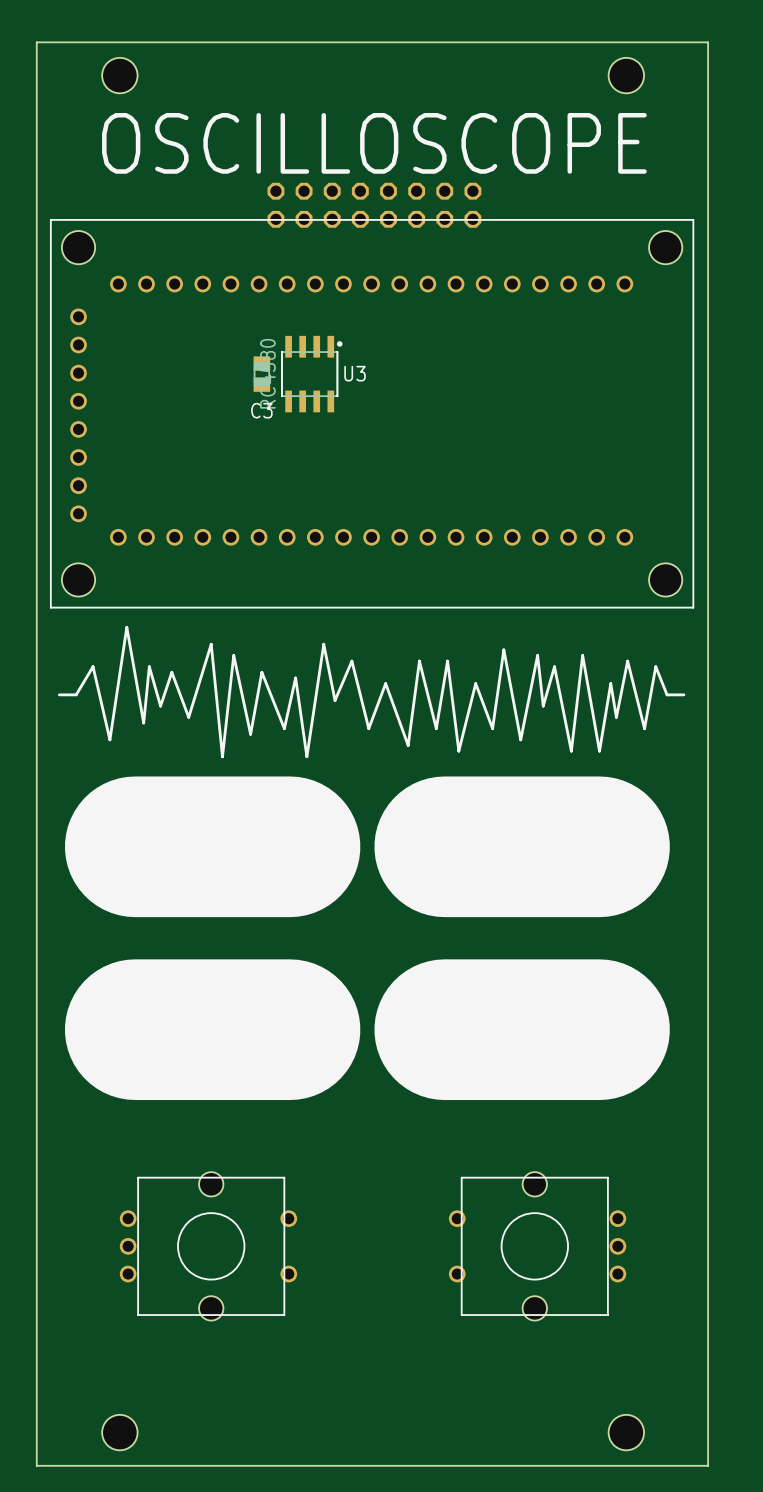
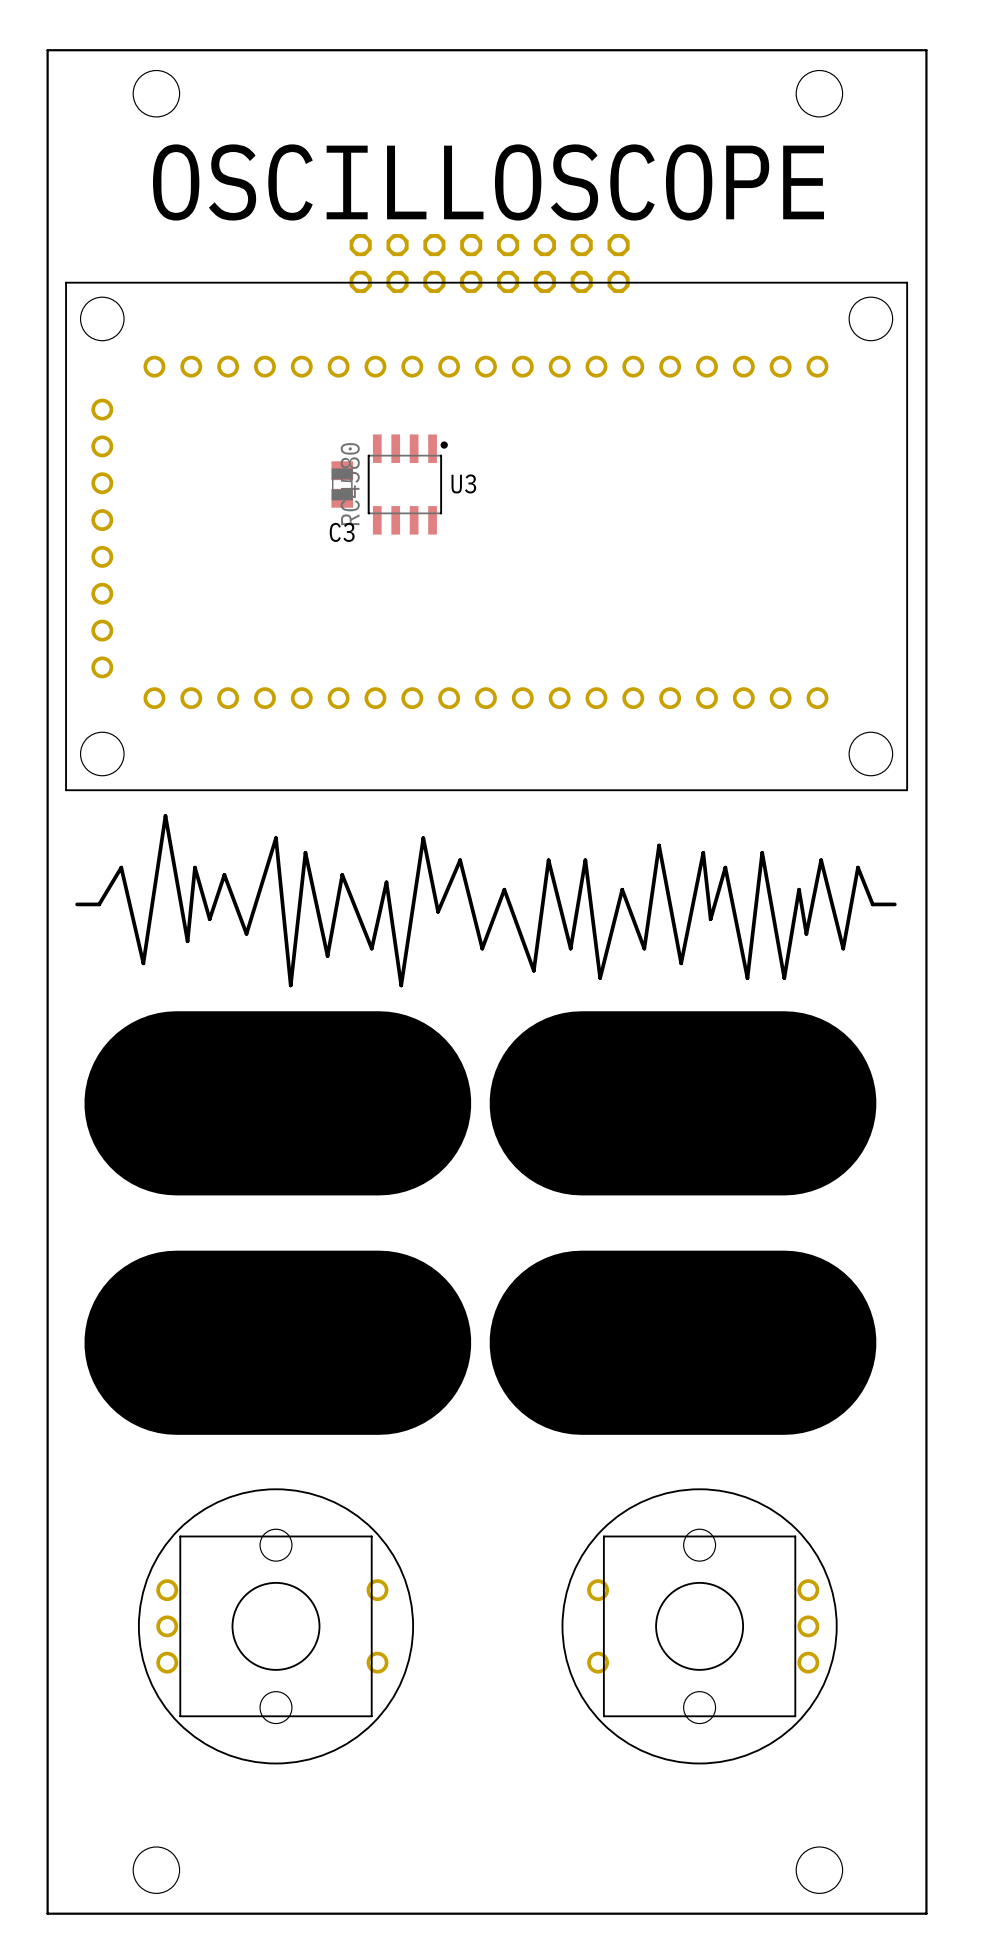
part footprint: [119, 1172, 298, 1321] -> [137, 1488, 415, 1765]
part footprint: [448, 1172, 627, 1321] -> [561, 1488, 838, 1765]

